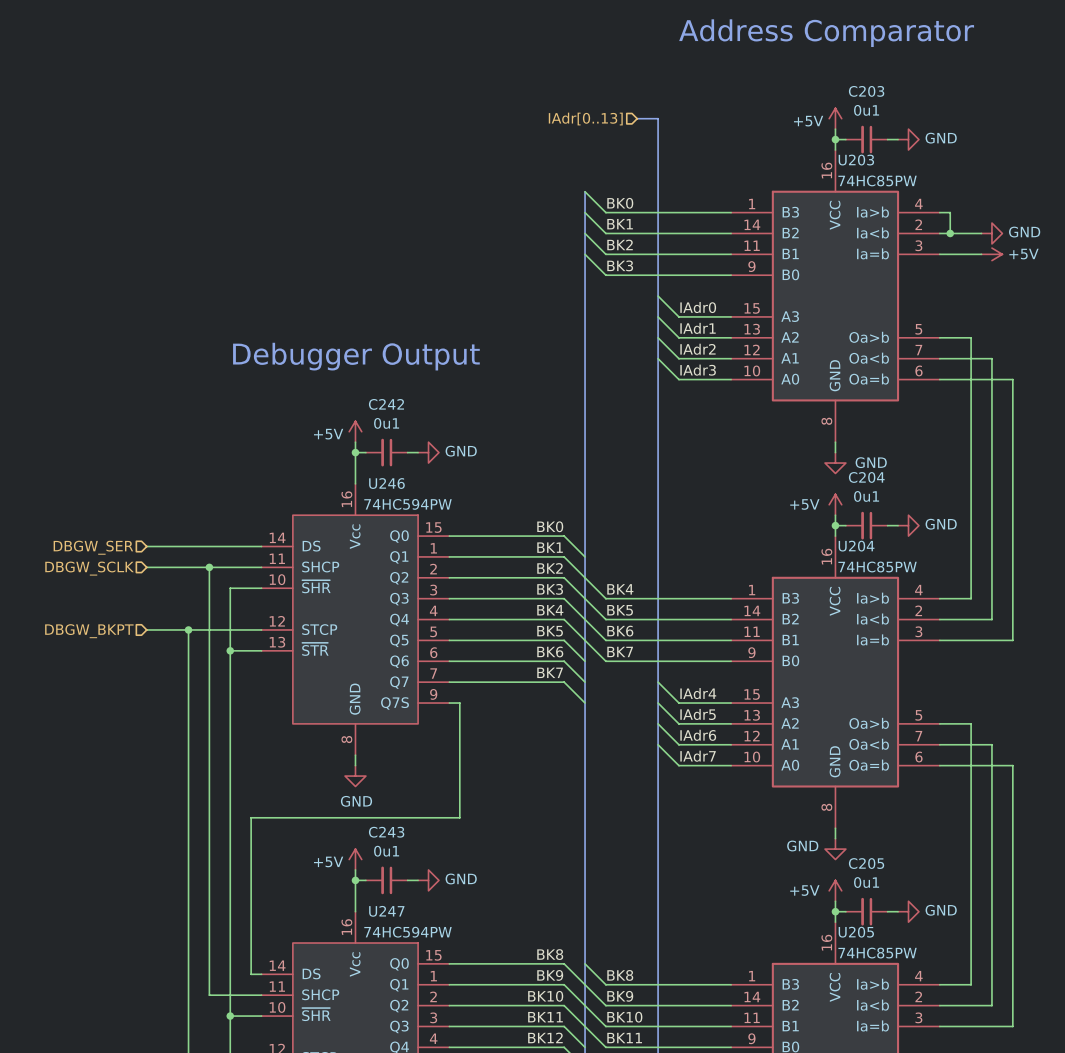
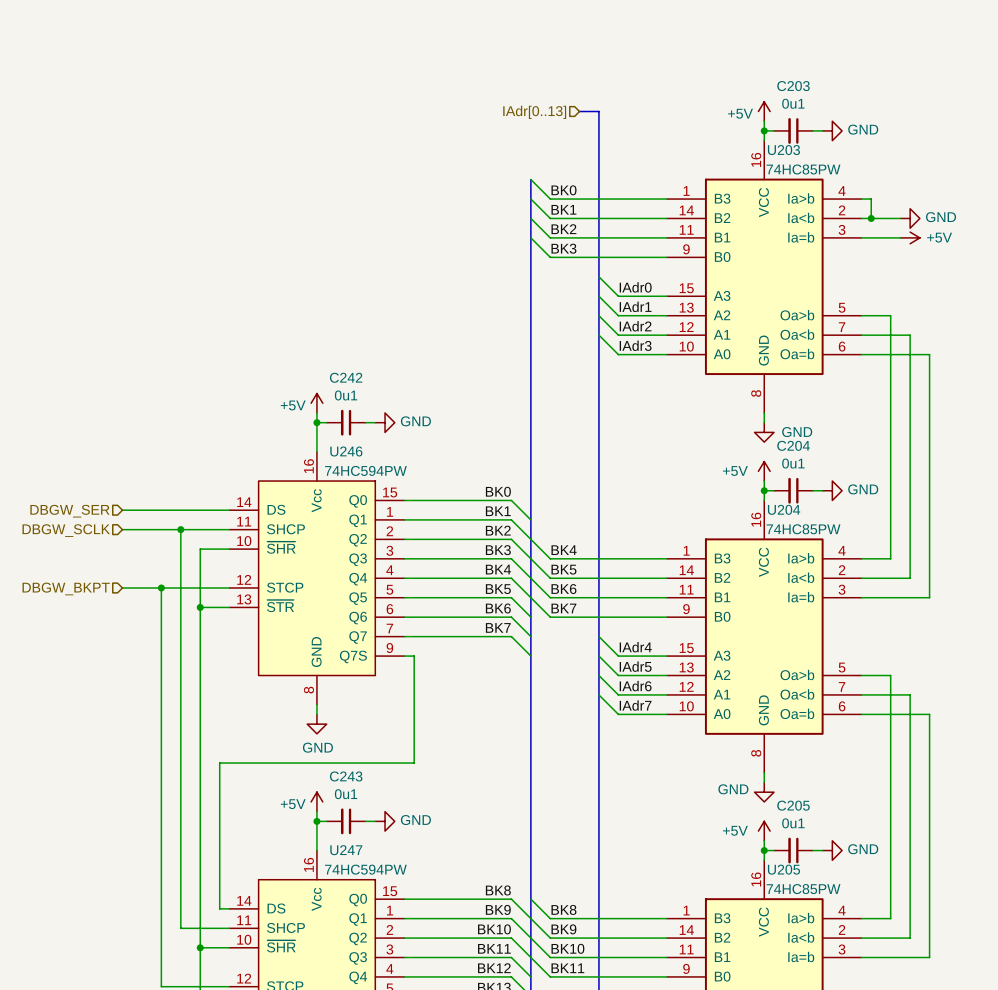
text: Address Comparator (826, 33) -> none
text: Debugger Output (356, 356) -> none

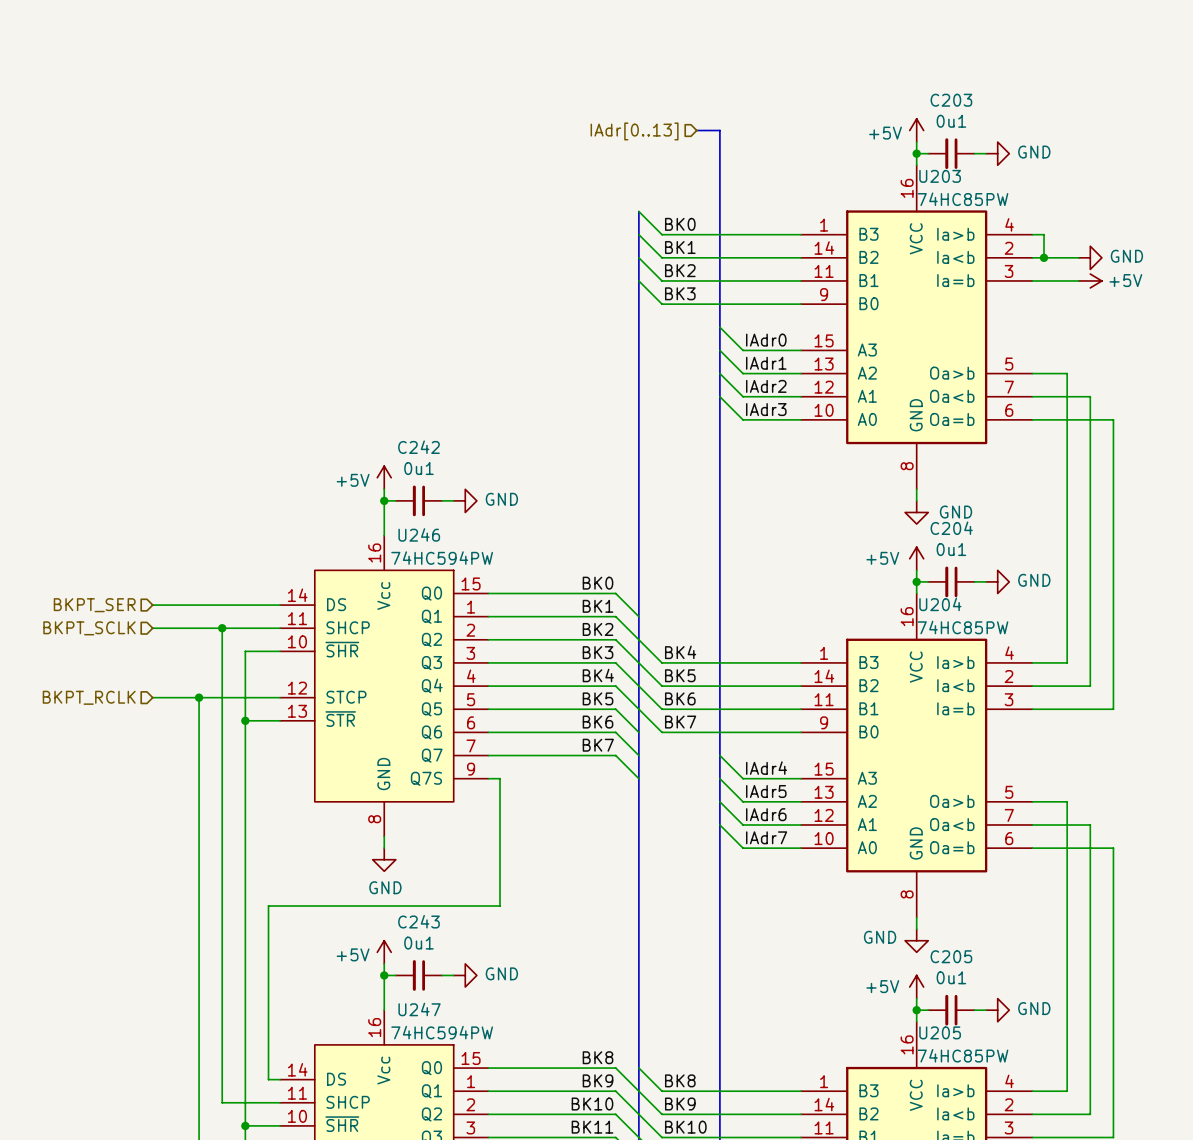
hierarchical label: DBGW_SER (69, 511) -> BKPT_SER (94, 605)
hierarchical label: DBGW_SCLK (66, 530) -> BKPT_SCLK (89, 628)
hierarchical label: DBGW_BKPT (66, 588) -> BKPT_RCLK (89, 697)

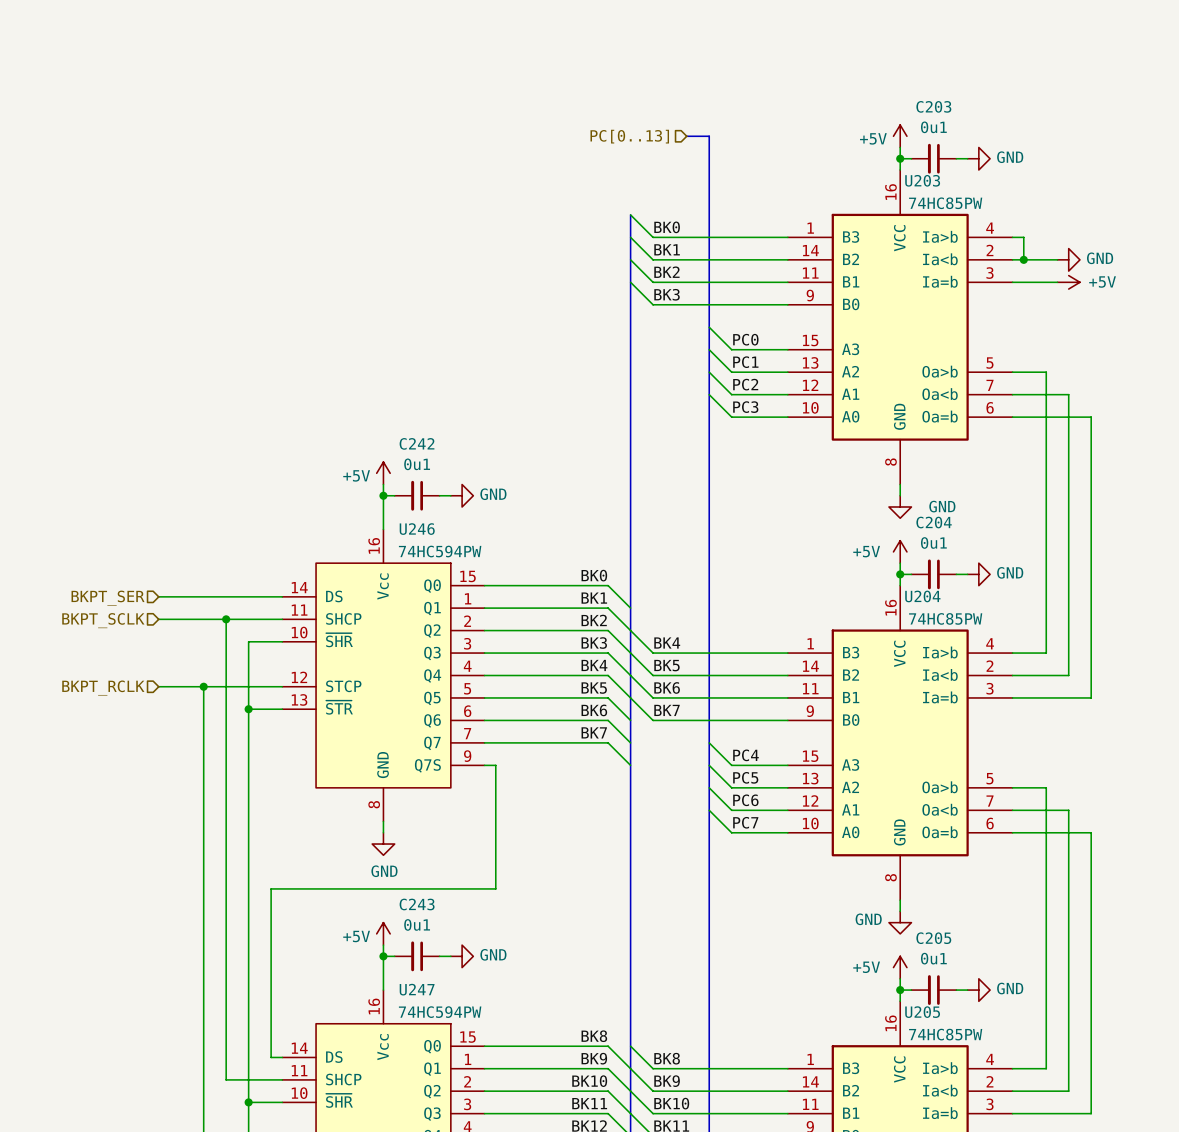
hierarchical label: IAdr[0..13] (634, 131) -> PC[0..13] (629, 136)
label: IAdr0 (766, 340) -> PC0 (745, 339)
label: IAdr1 (766, 363) -> PC1 (745, 362)
label: IAdr2 (766, 386) -> PC2 (745, 384)
label: IAdr3 (766, 409) -> PC3 (745, 407)
label: IAdr4 (766, 768) -> PC4 (745, 755)
label: IAdr5 (766, 791) -> PC5 (745, 777)
label: IAdr6 (766, 814) -> PC6 (745, 800)
label: IAdr7 (766, 837) -> PC7 (745, 822)

